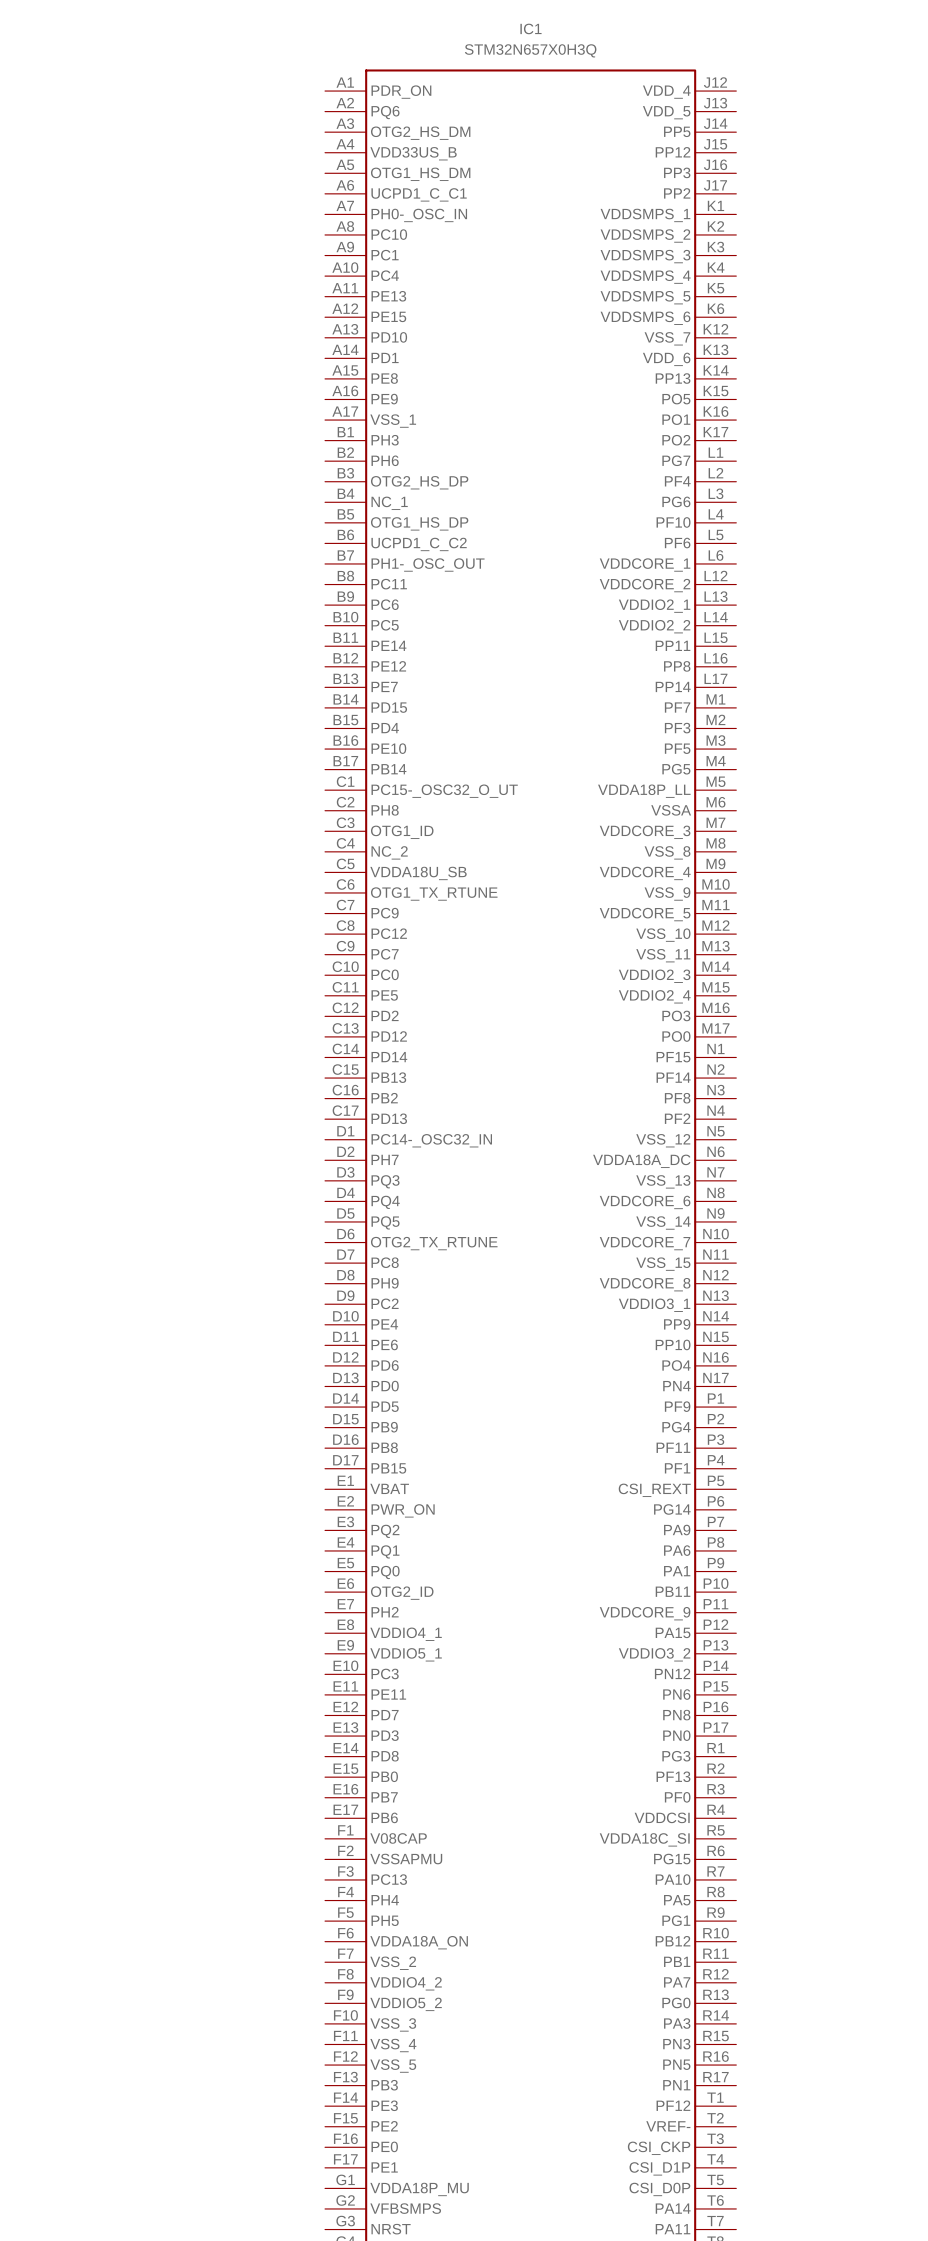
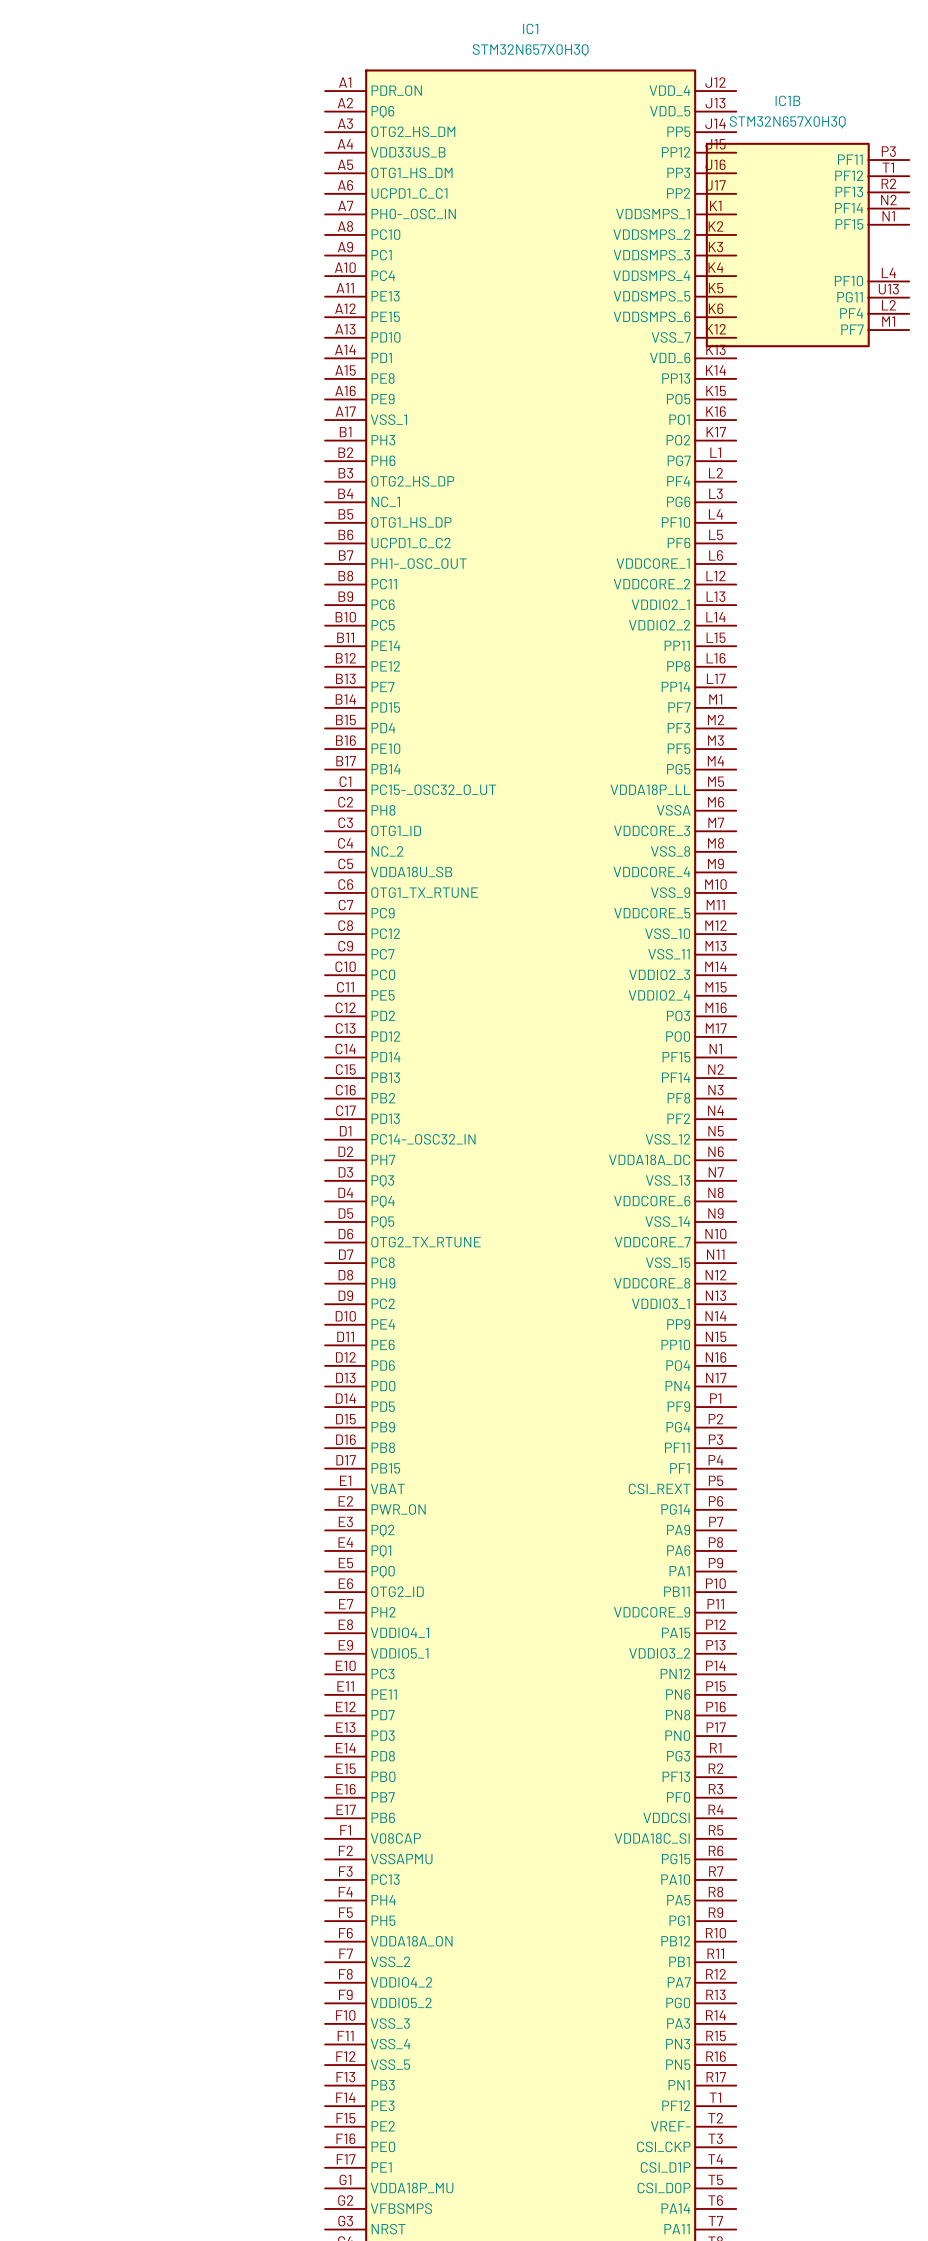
IC1B: none -> STM32N657X0H3Q (807, 245)

